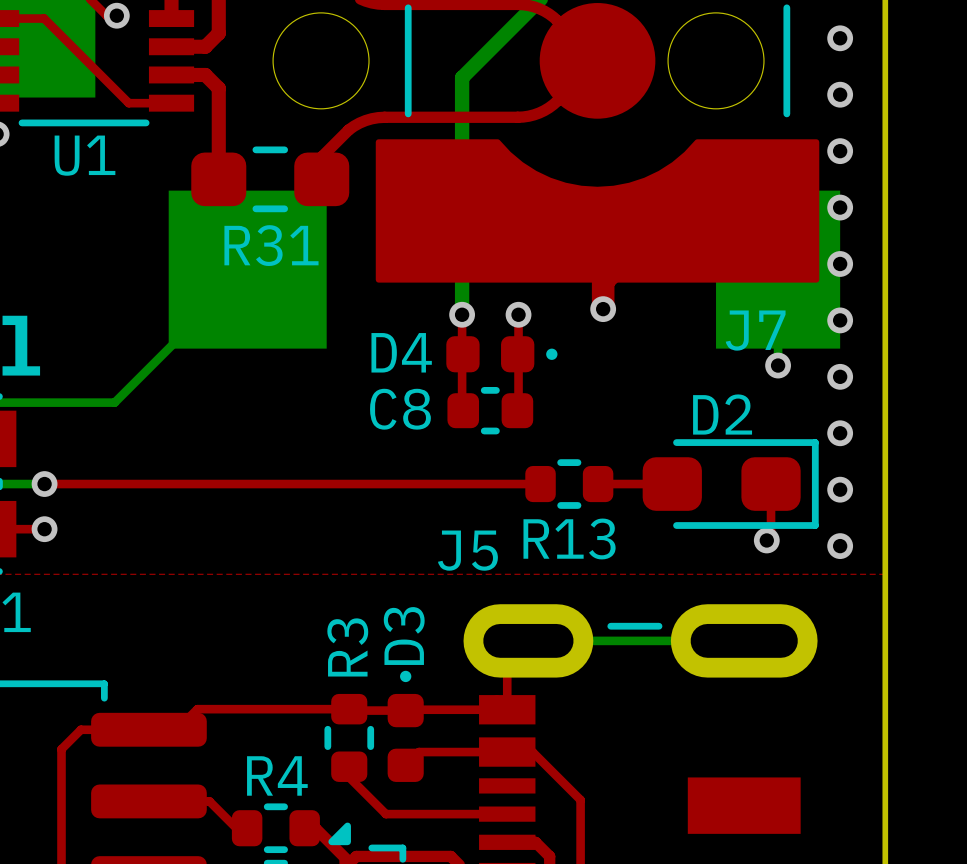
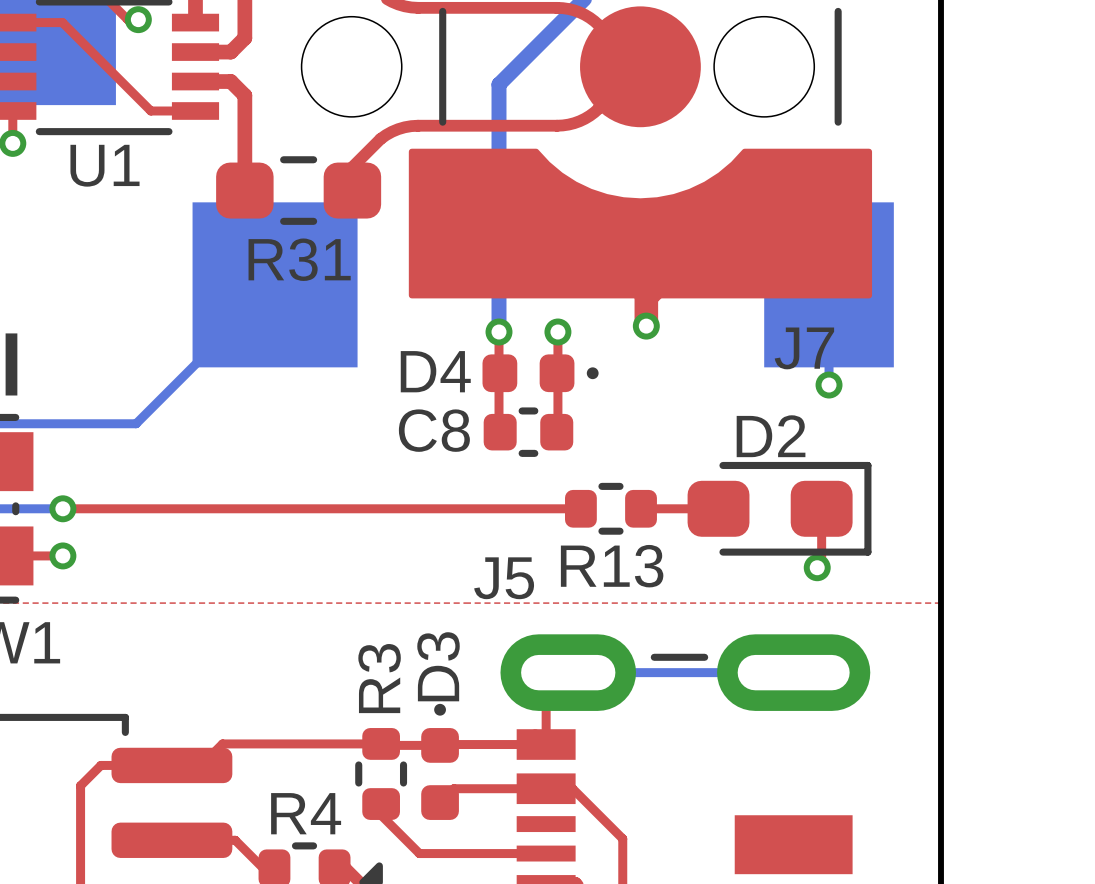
via: (840, 38) -> none
via: (840, 94) -> none
via: (840, 151) -> none
via: (840, 207) -> none
via: (840, 263) -> none
via: (840, 320) -> none
via: (840, 376) -> none
via: (840, 433) -> none
via: (840, 489) -> none
via: (840, 546) -> none

